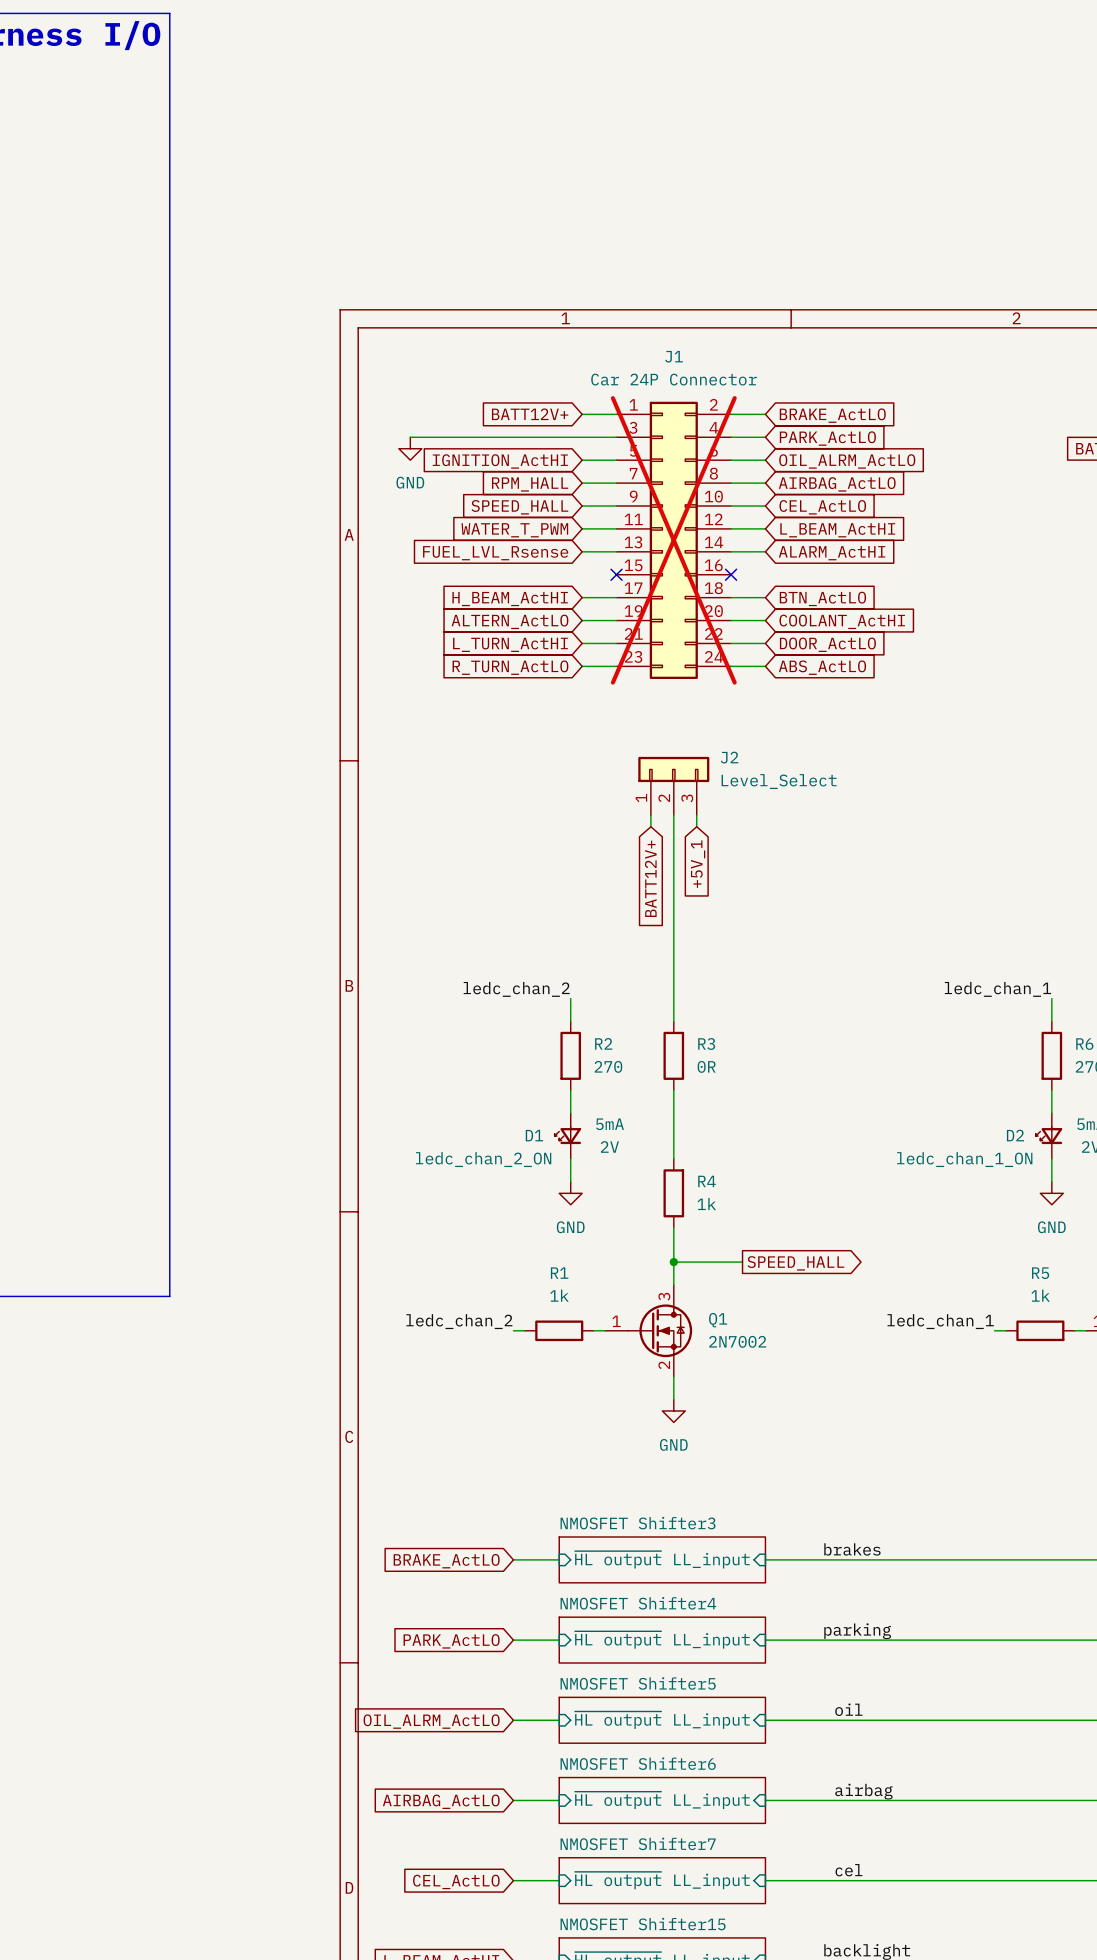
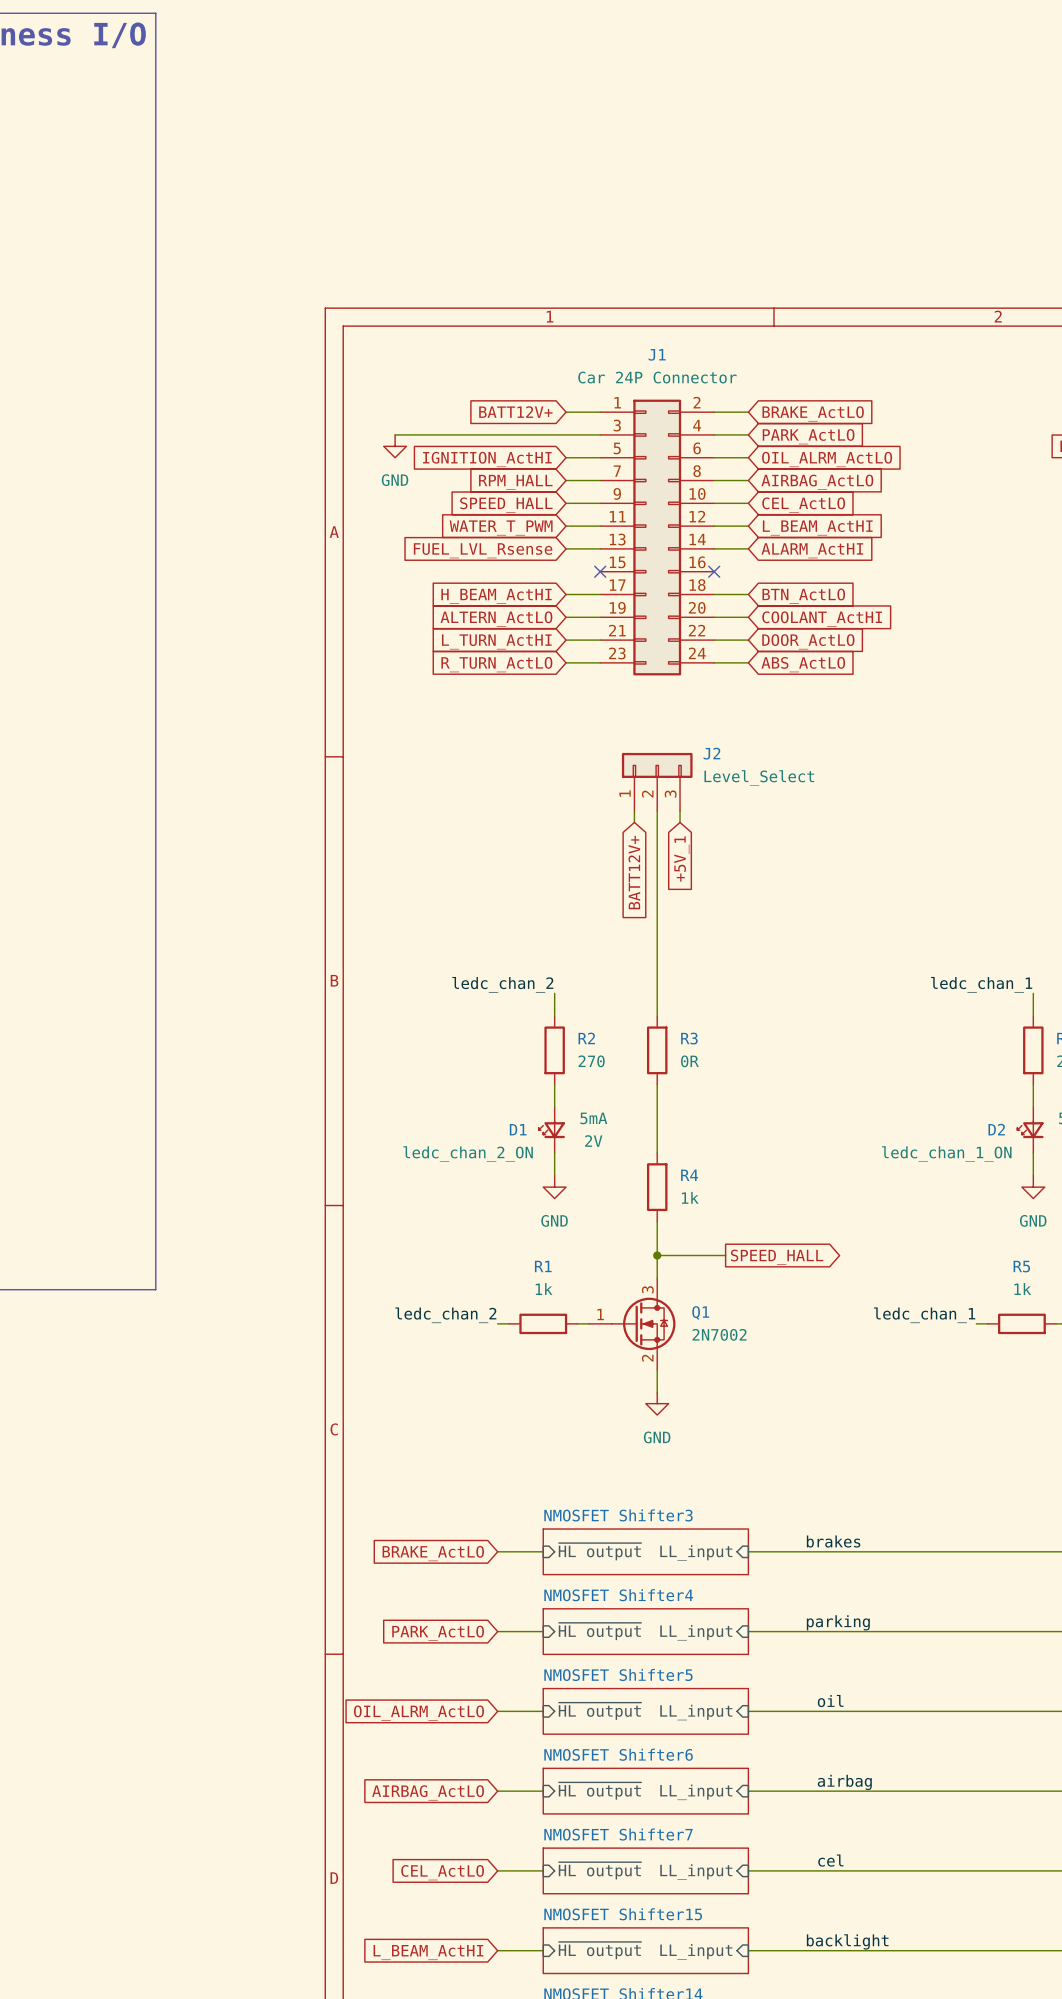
J1 do-not-place cross: (673, 540) -> none

